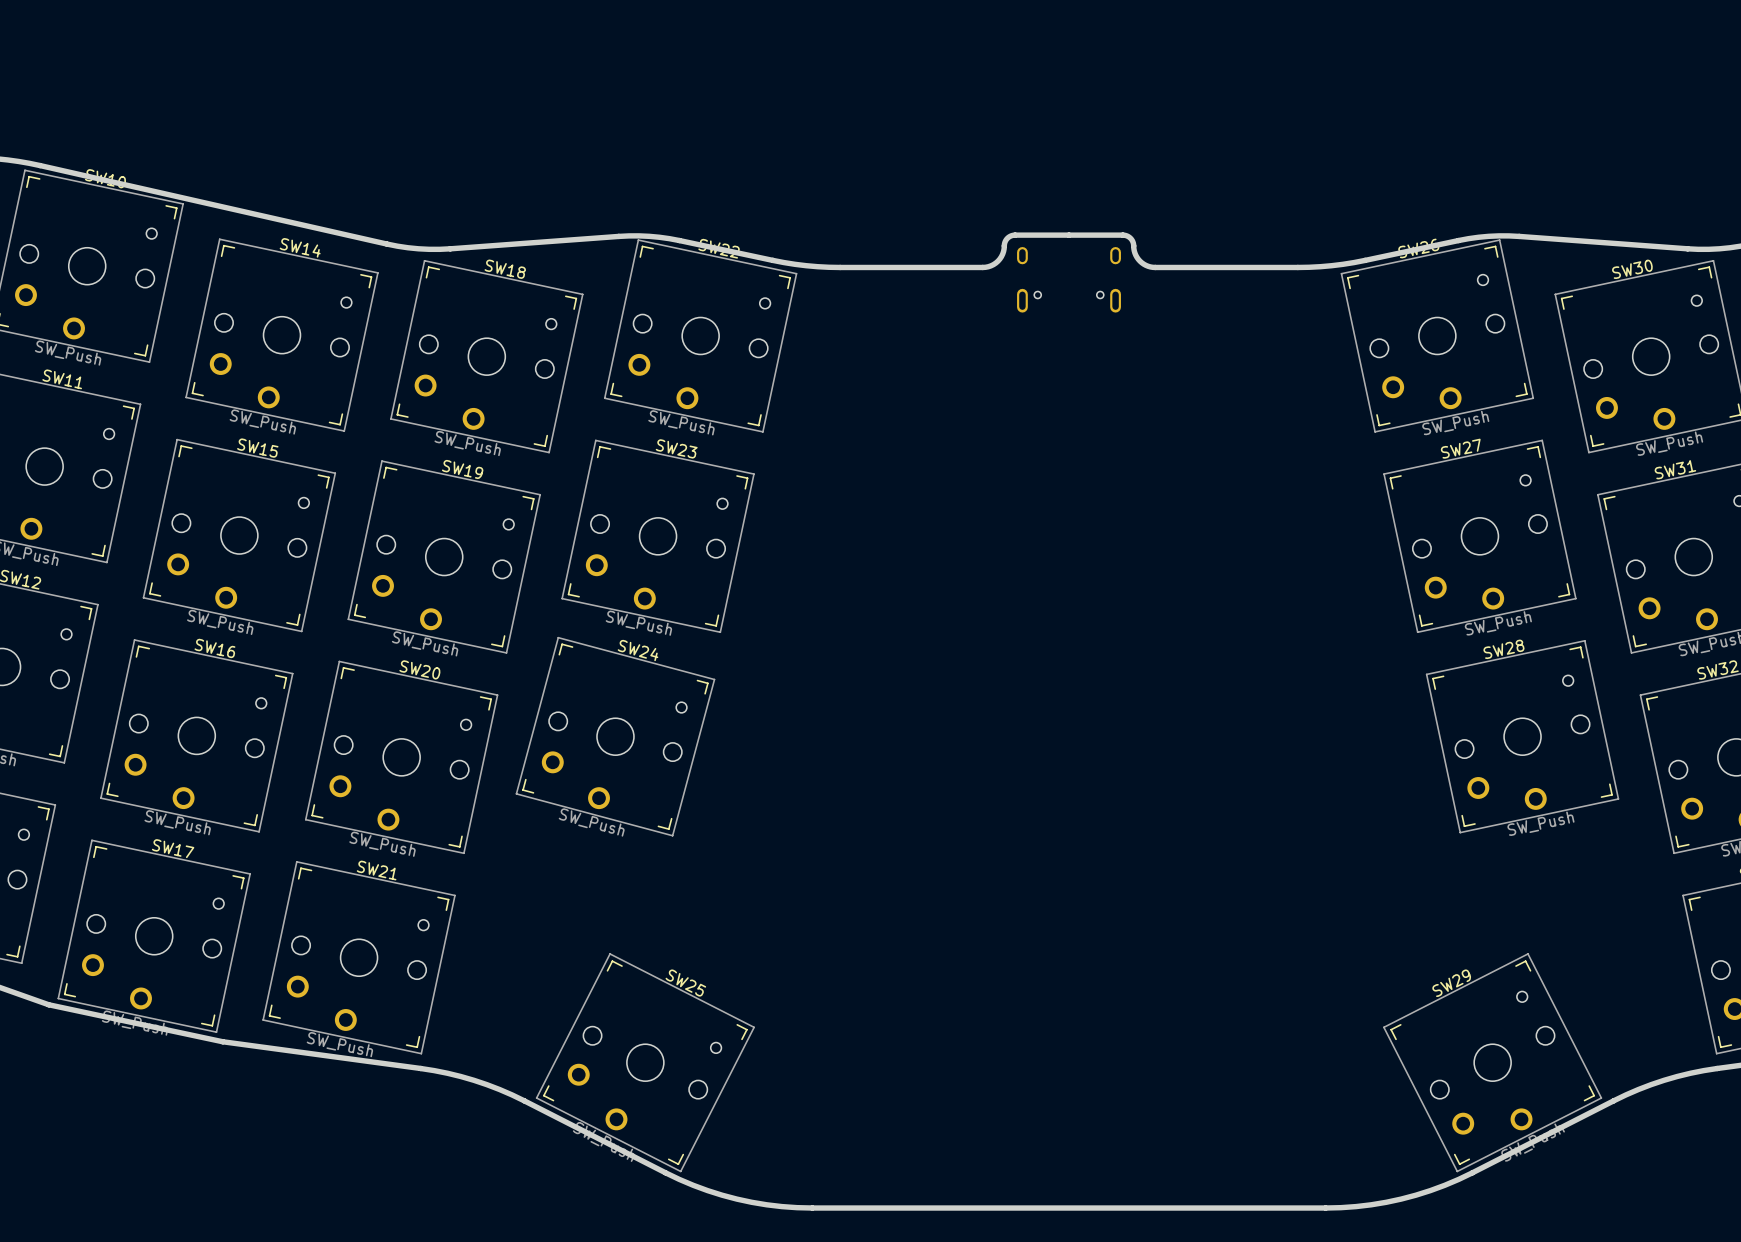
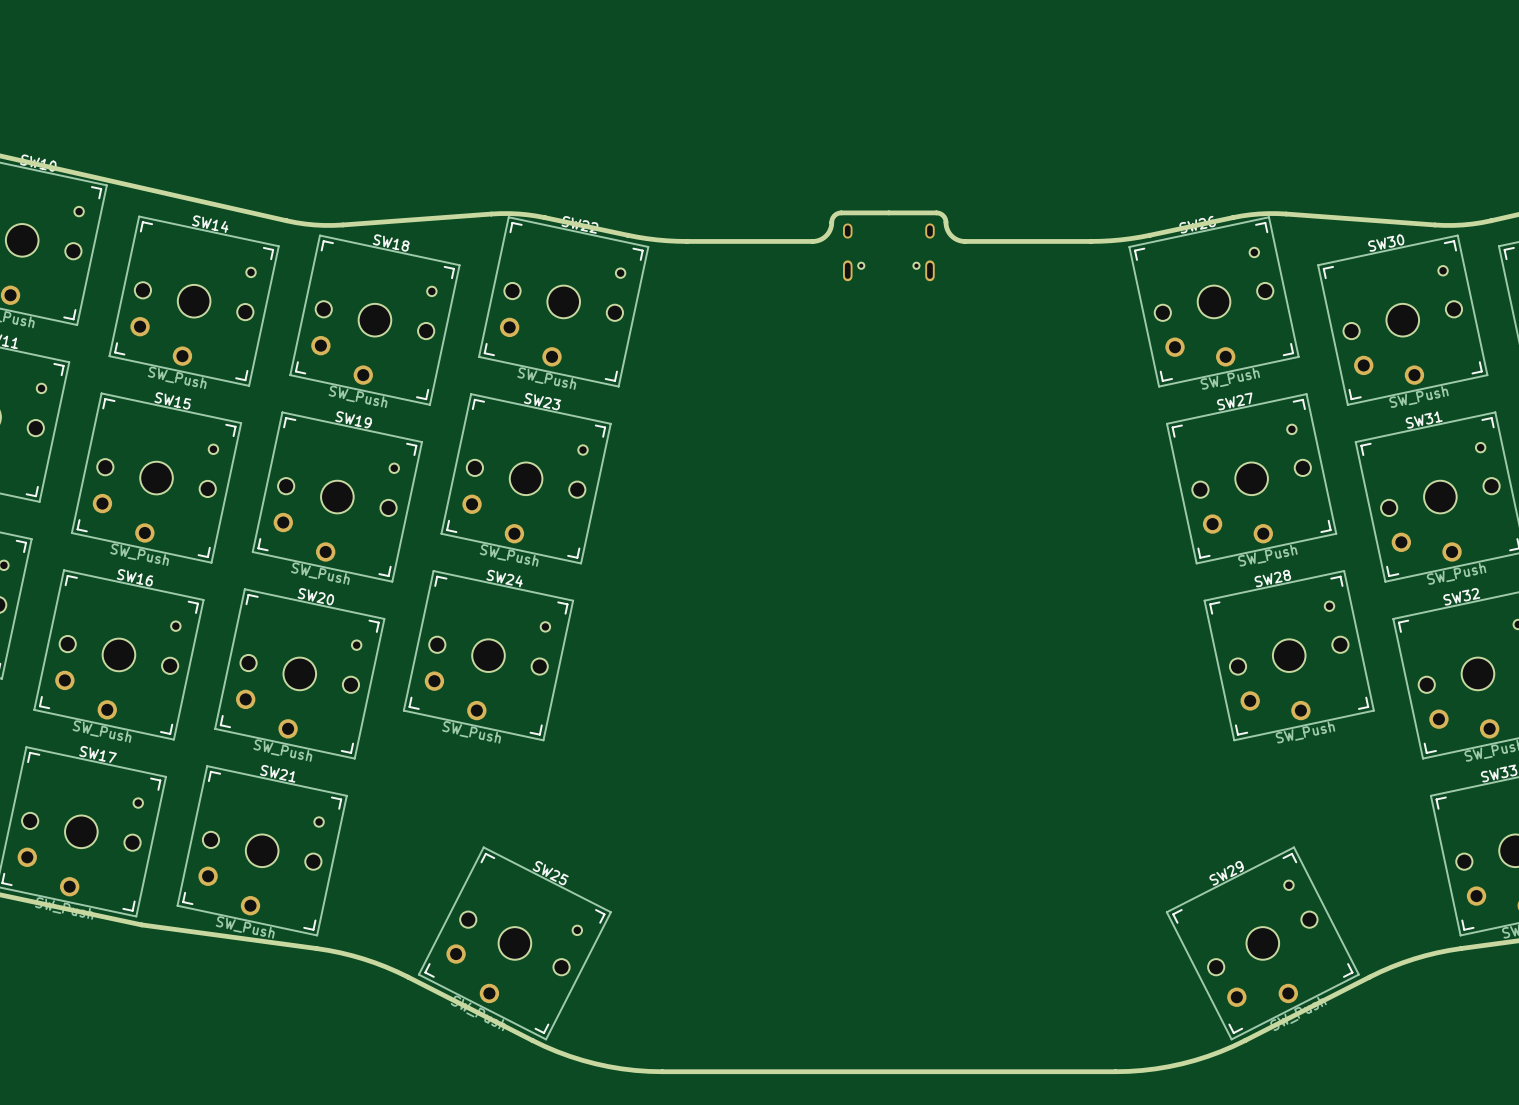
SW24 rotation: 0° (615, 736) -> 3° counterclockwise (488, 655)

